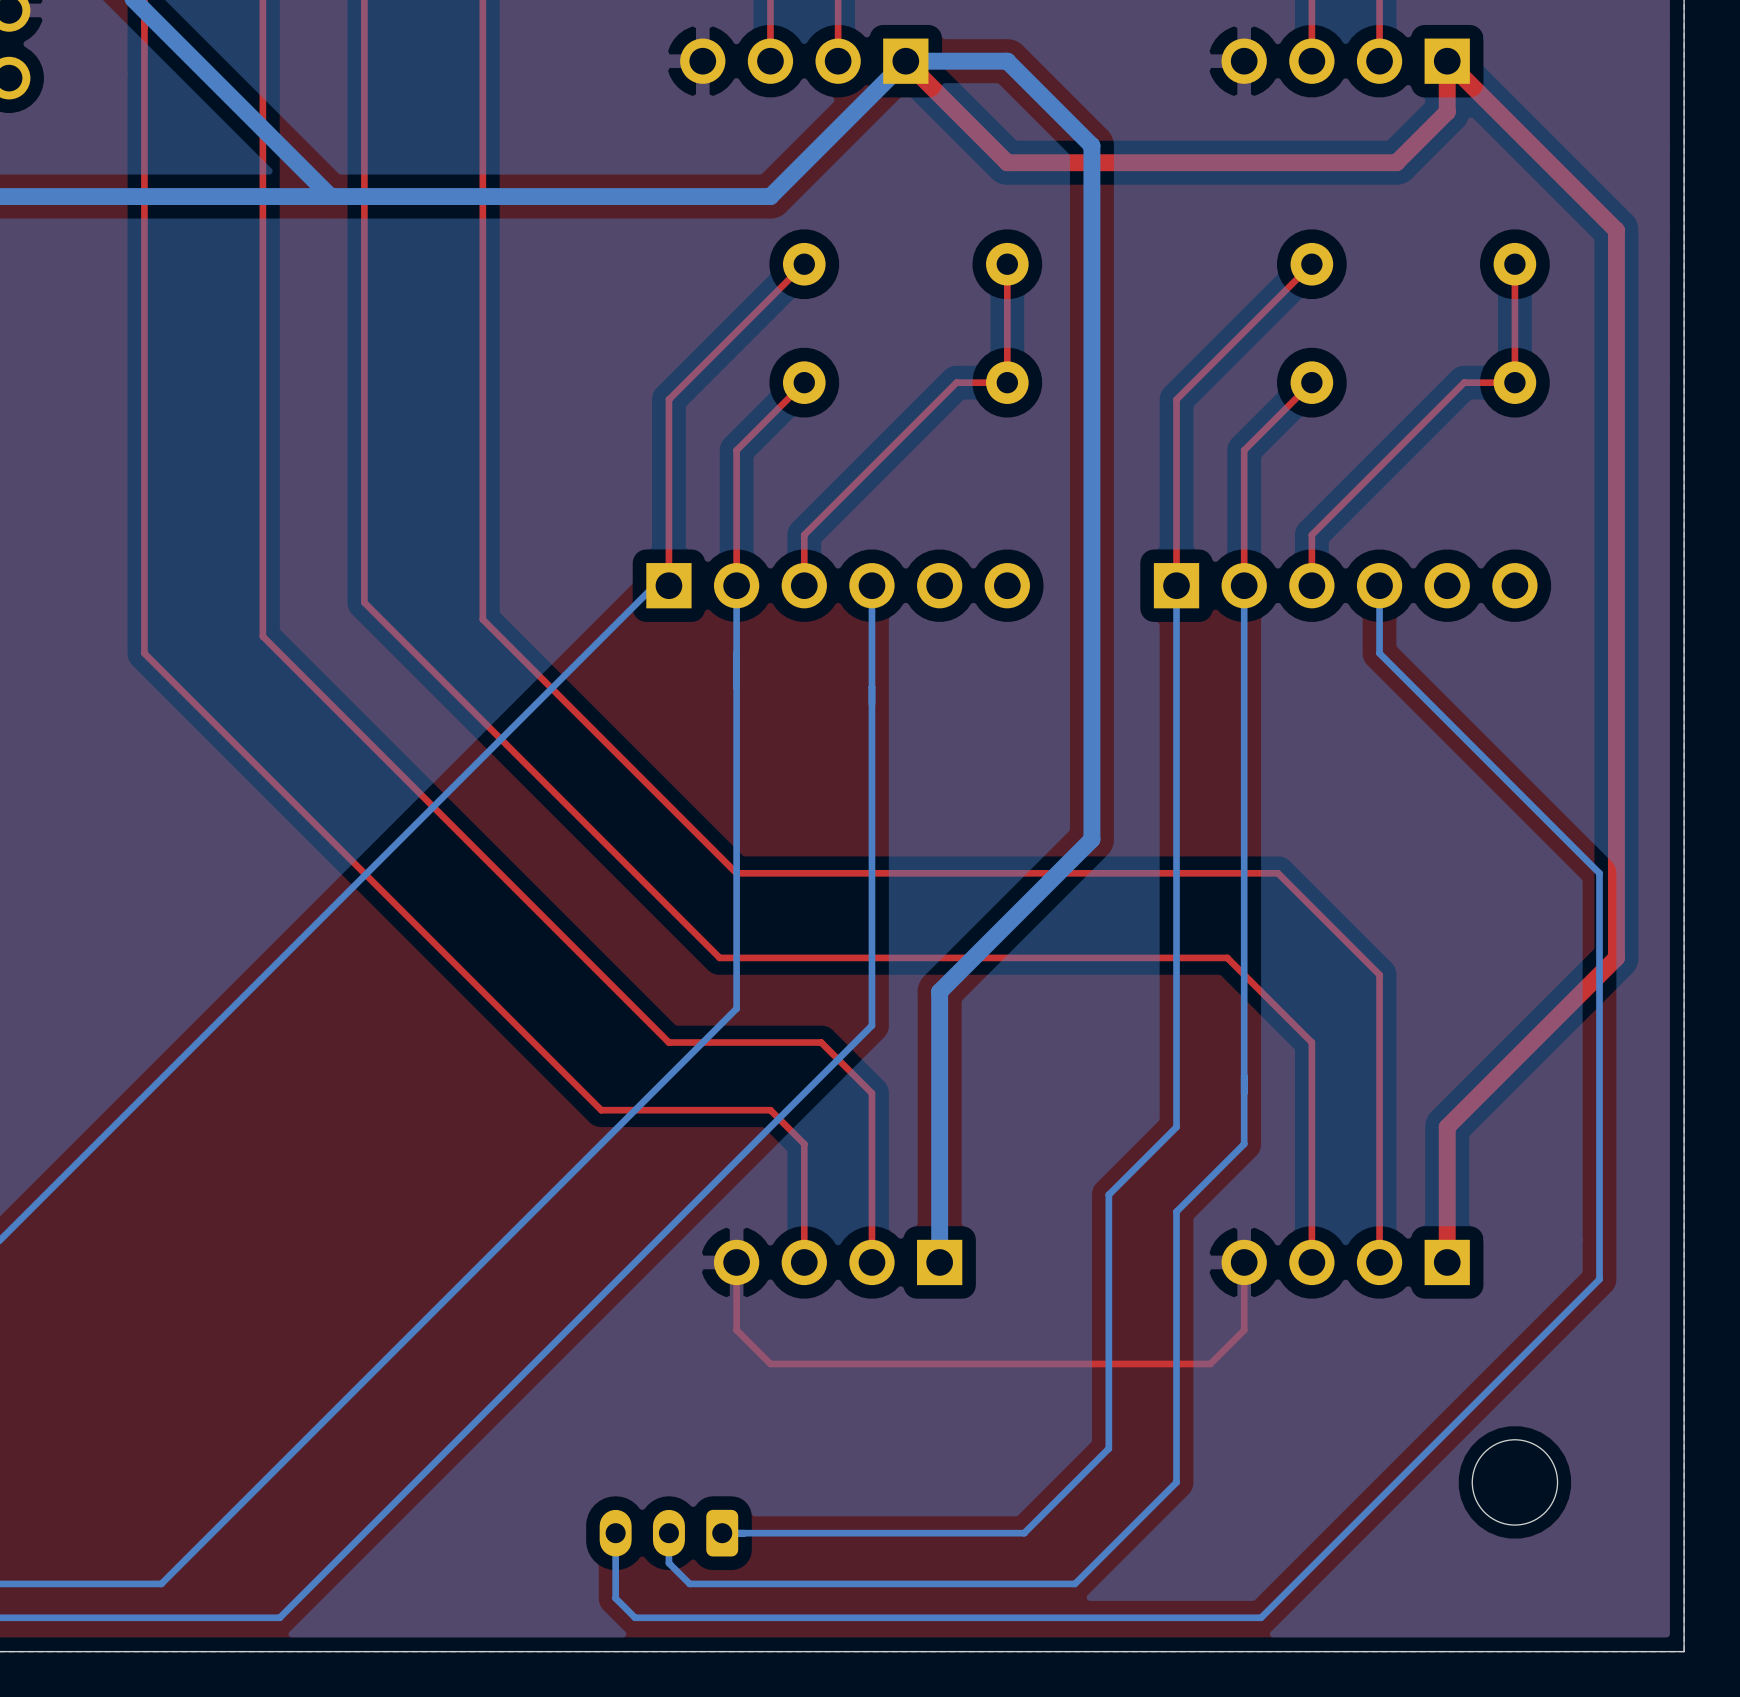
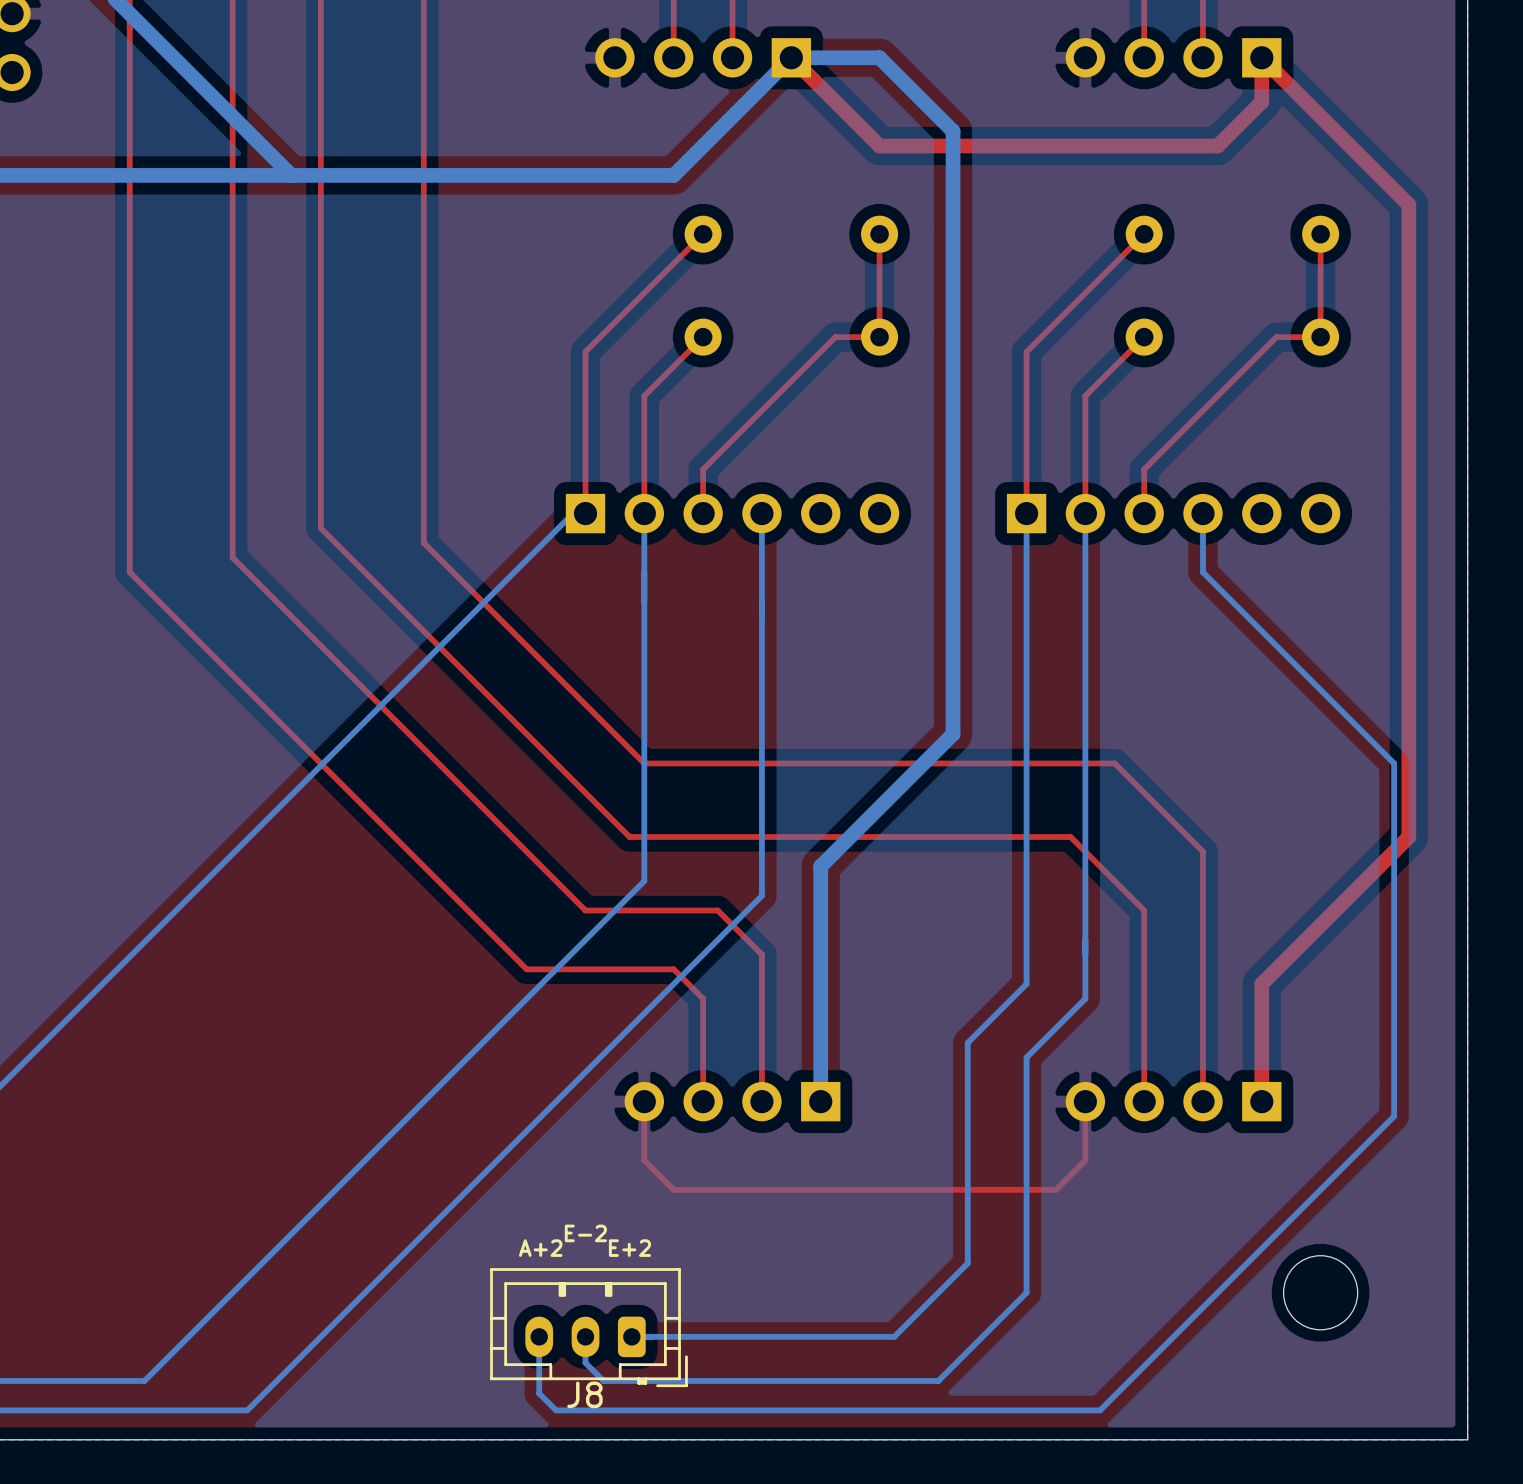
text: none -> E-2 (585, 1233)
text: none -> A+2 (540, 1248)
text: none -> E+2 (629, 1248)
J8 side: top (668, 1533) -> bottom (588, 1327)

